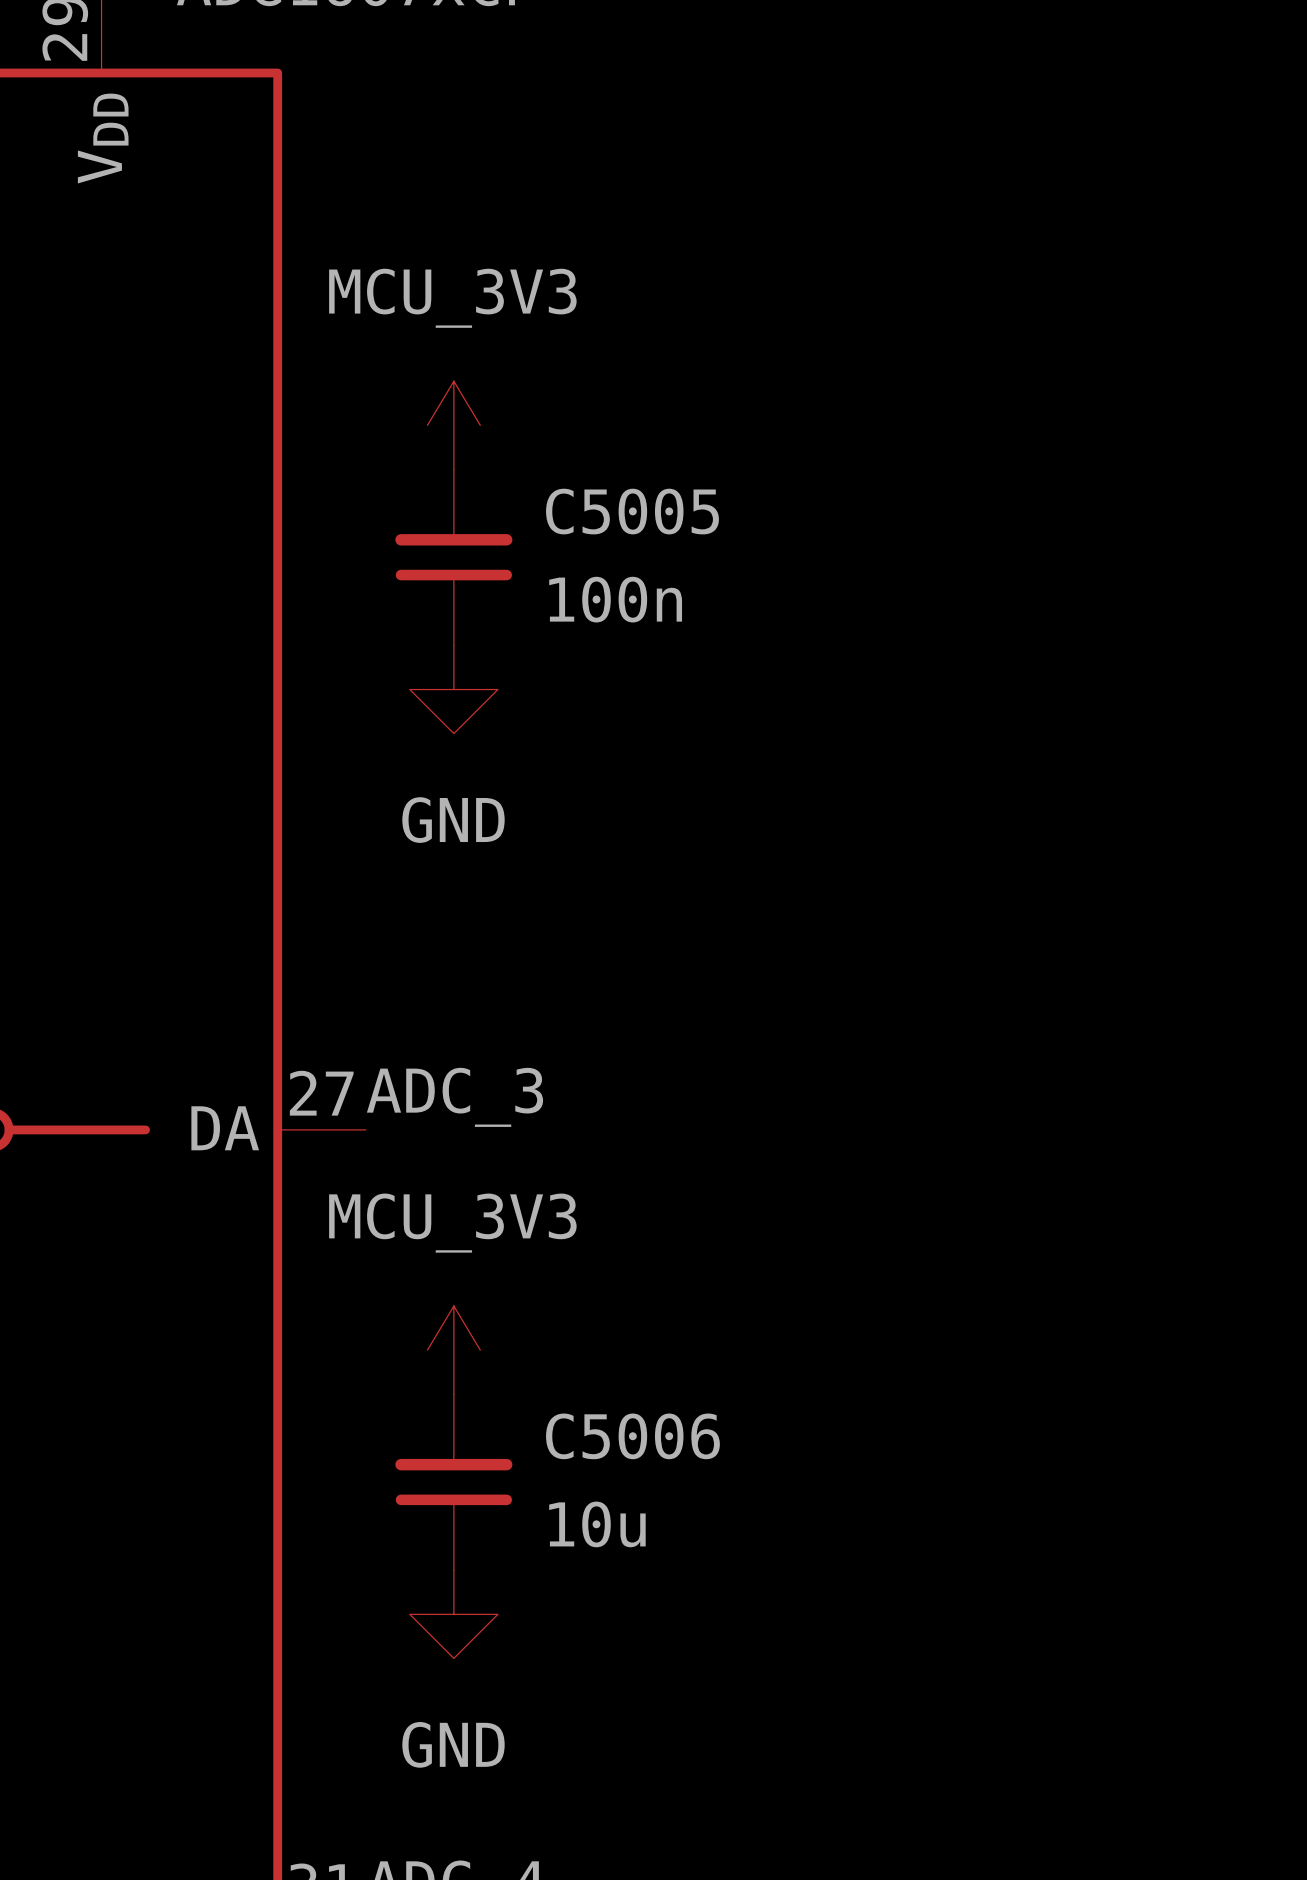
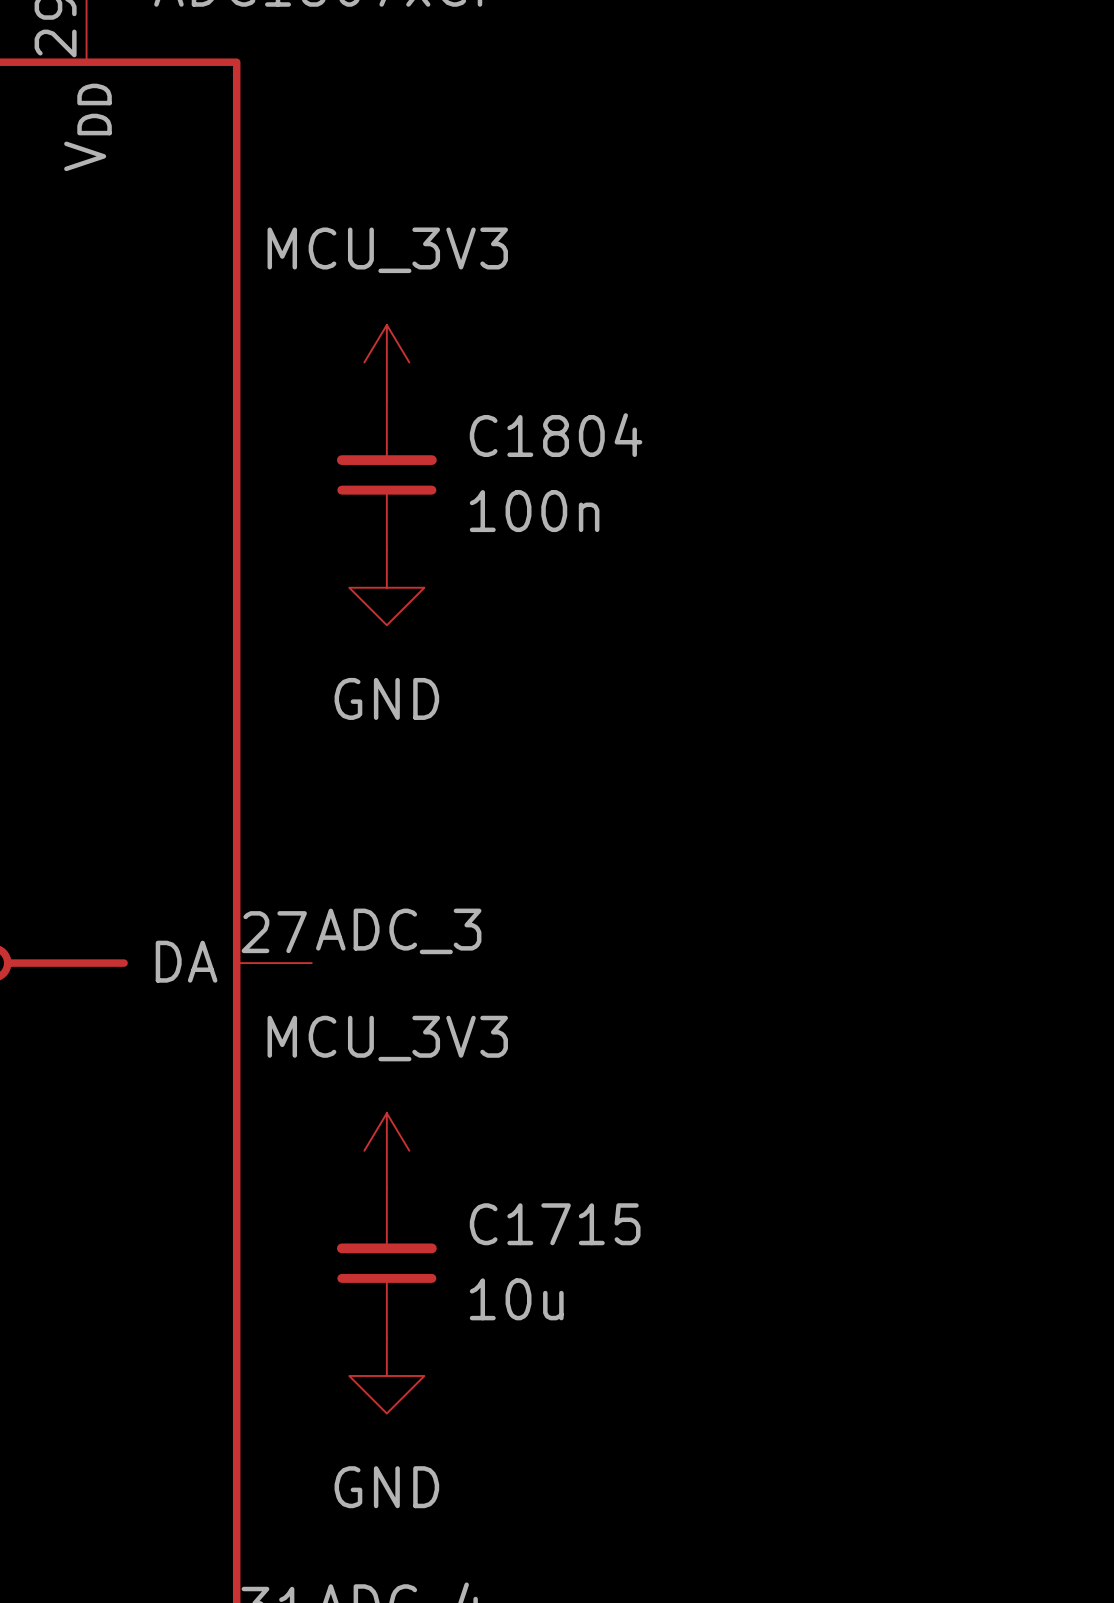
C5005 name: C5005 (632, 511) -> C1804 (556, 435)
C5006 name: C5006 (632, 1436) -> C1715 (555, 1224)

